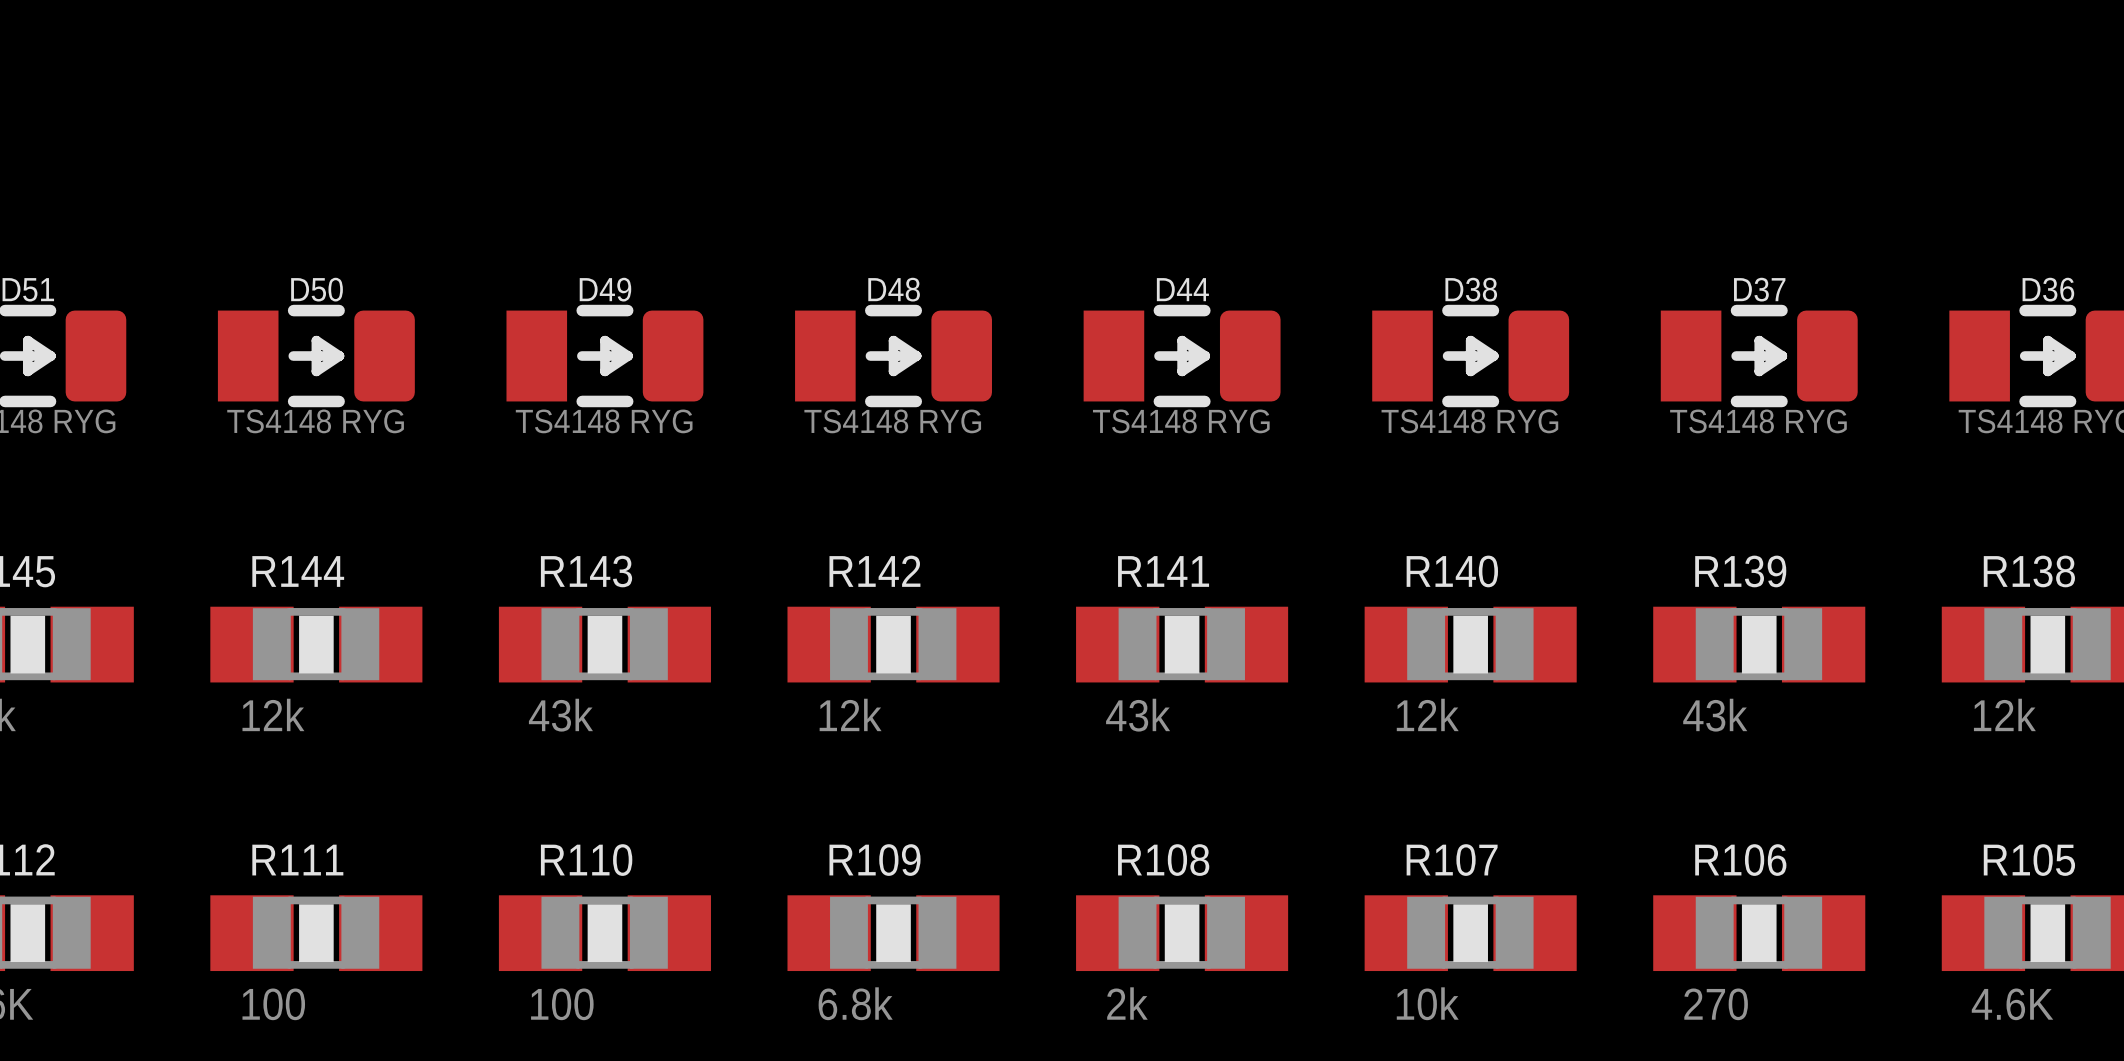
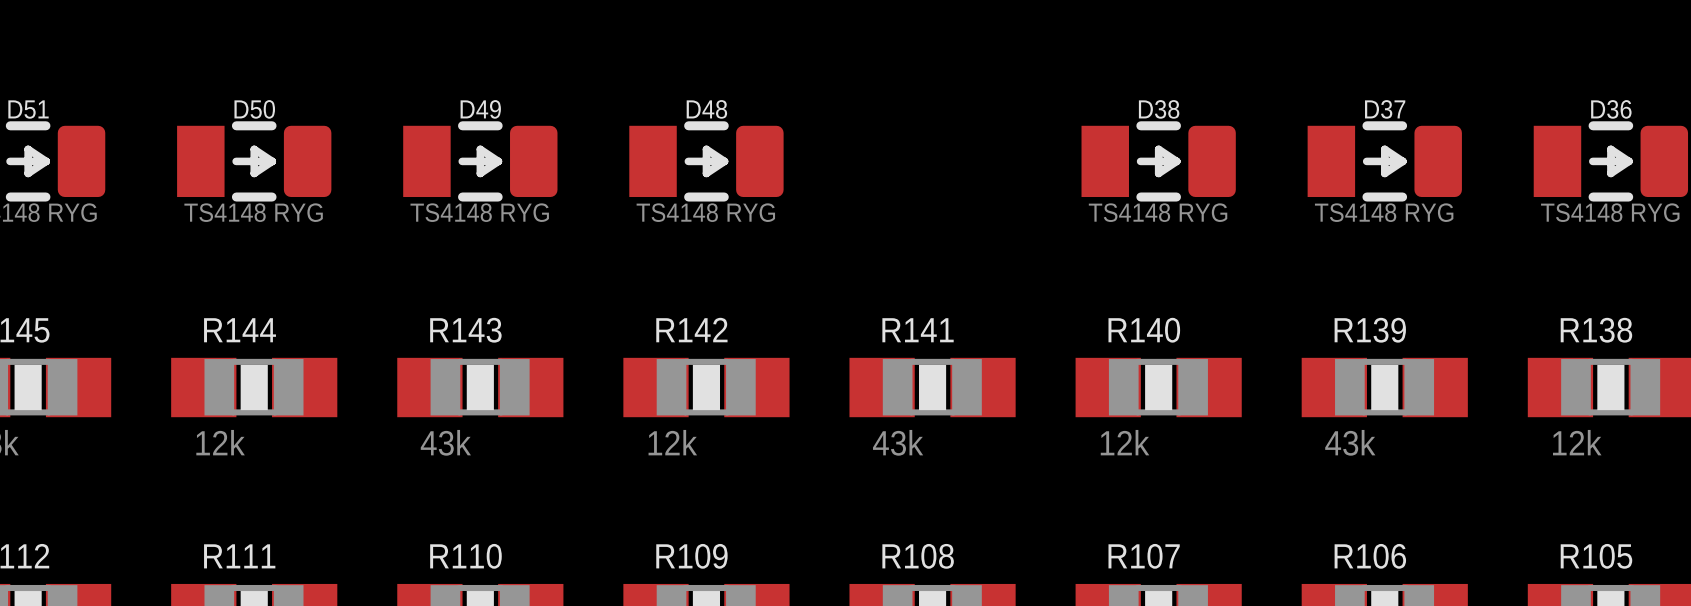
D44: TS4148 RYG (1182, 356) -> none

